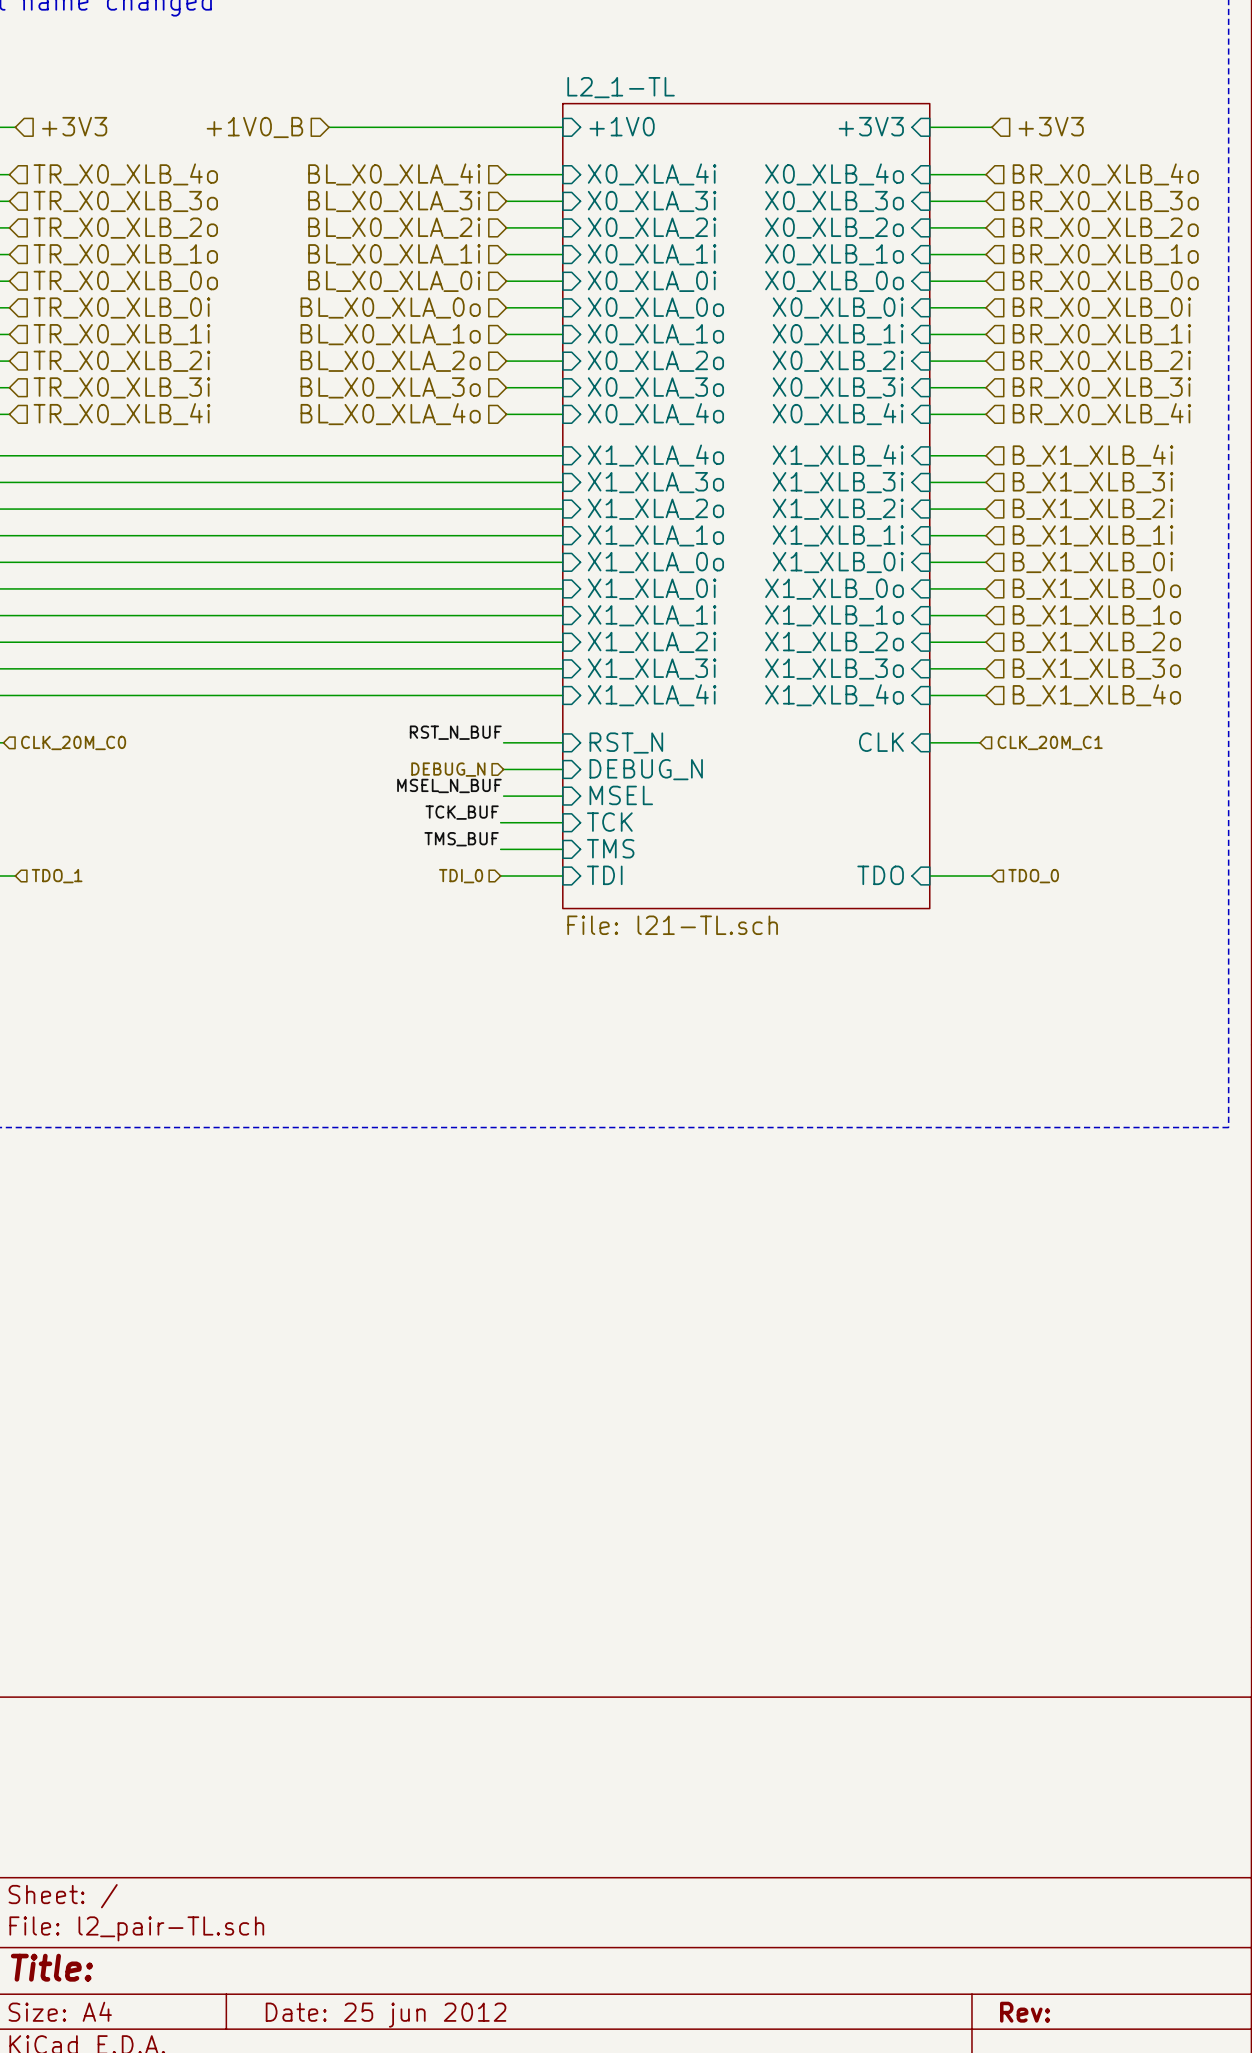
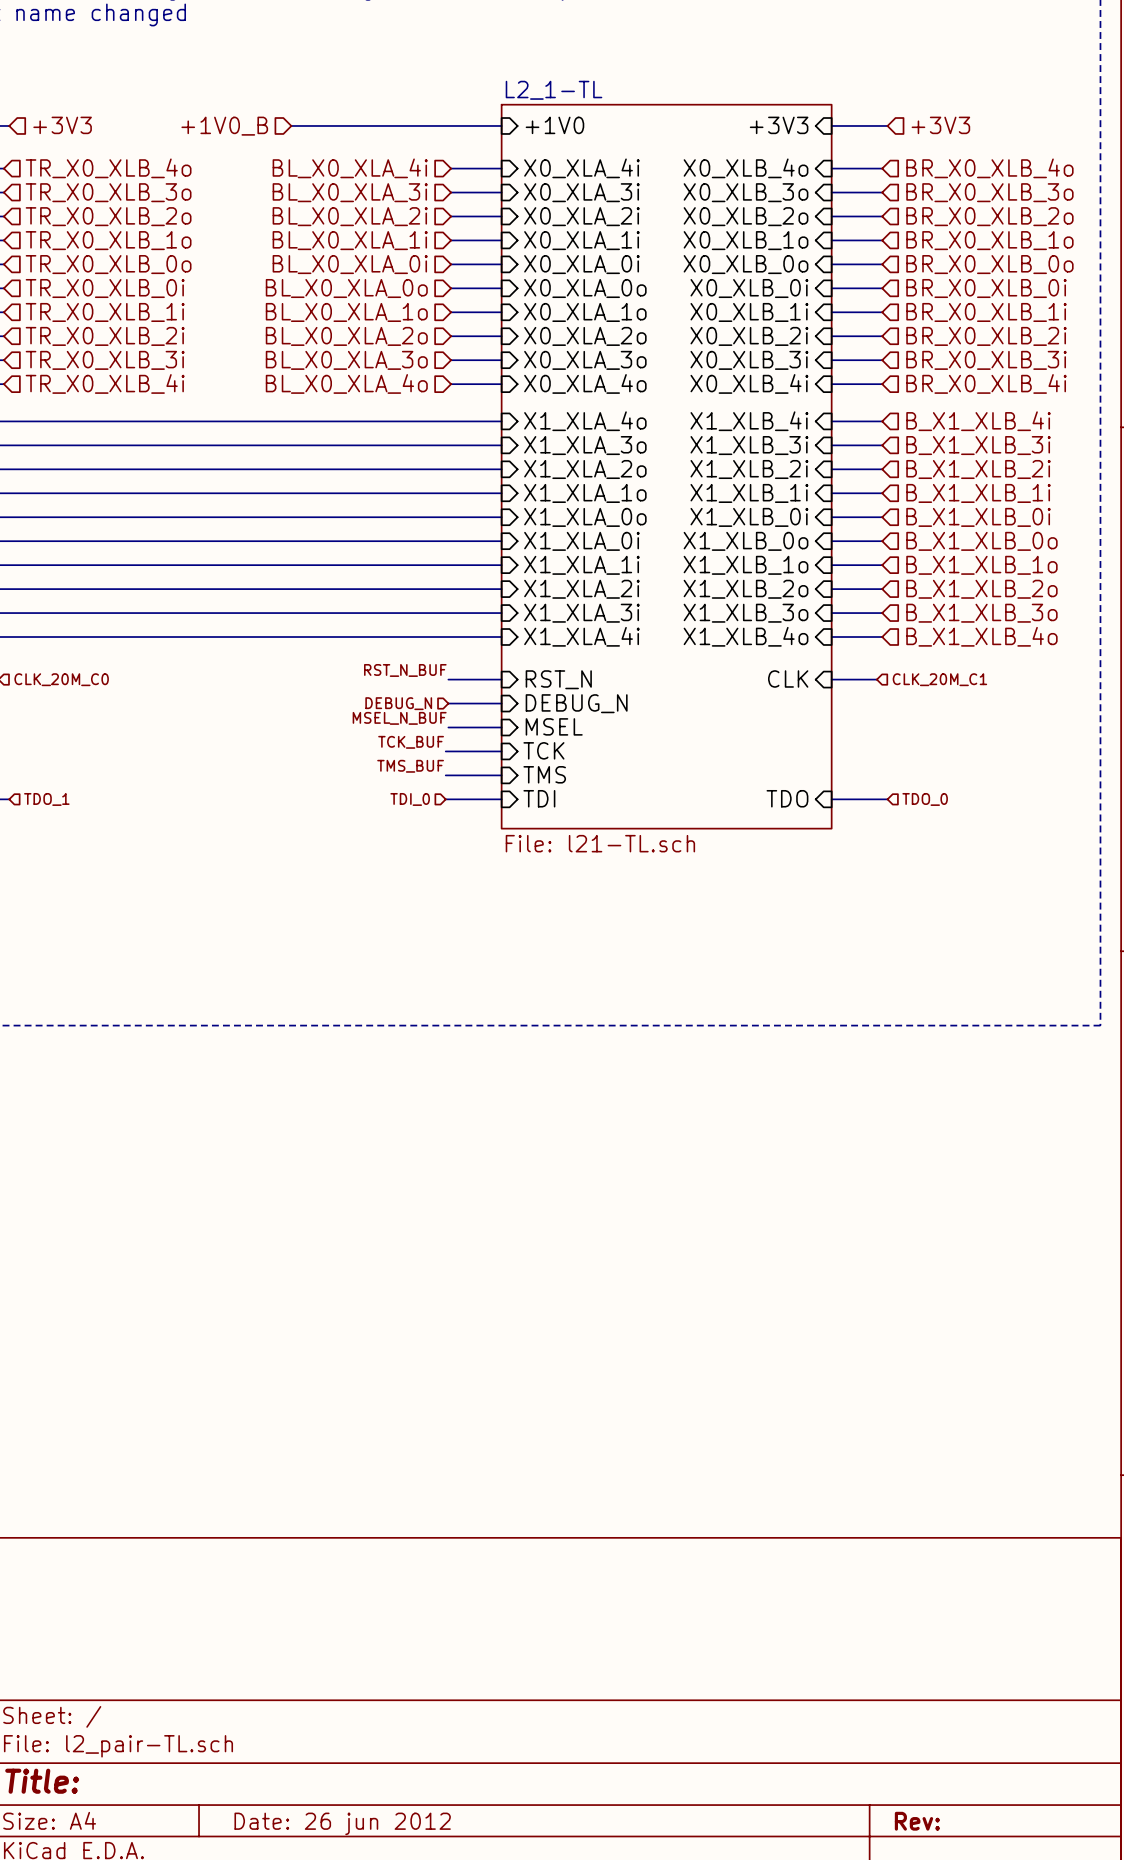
title block: Date: 25 jun 2012 (386, 2015) -> Date: 26 jun 2012 (342, 1823)

